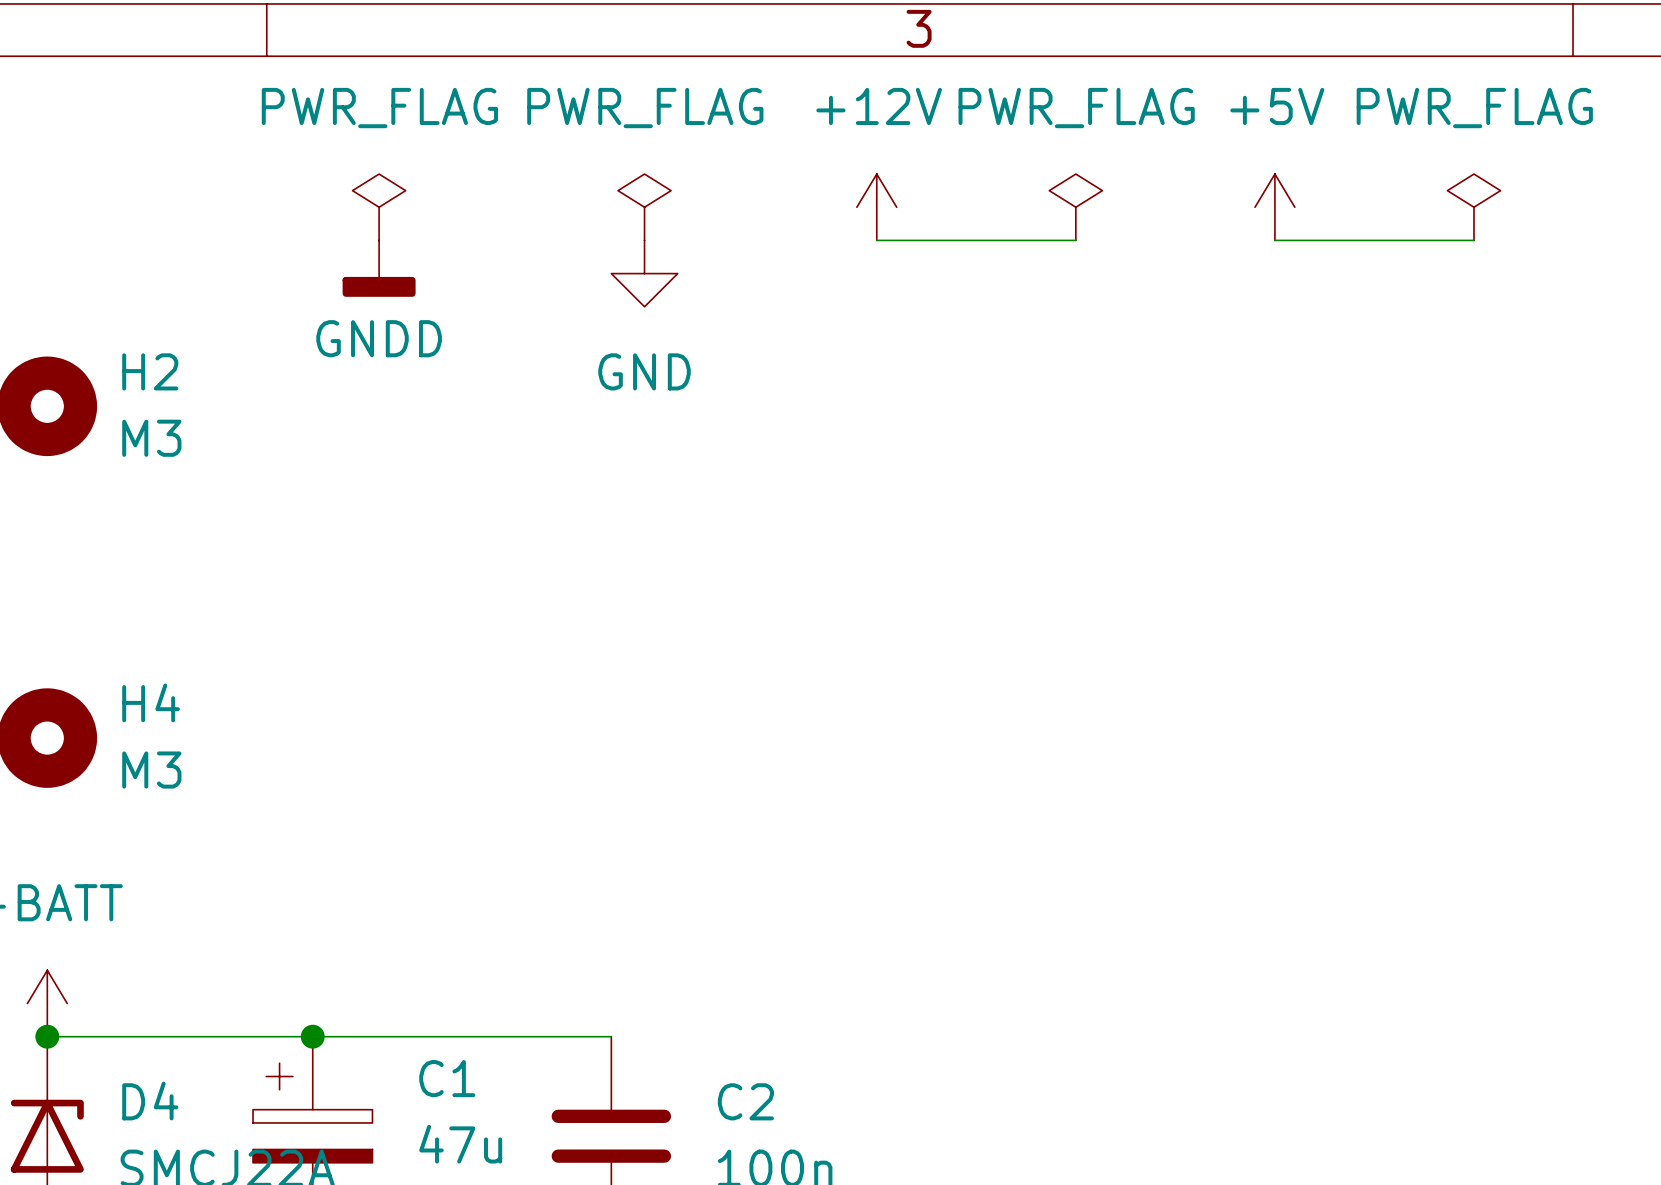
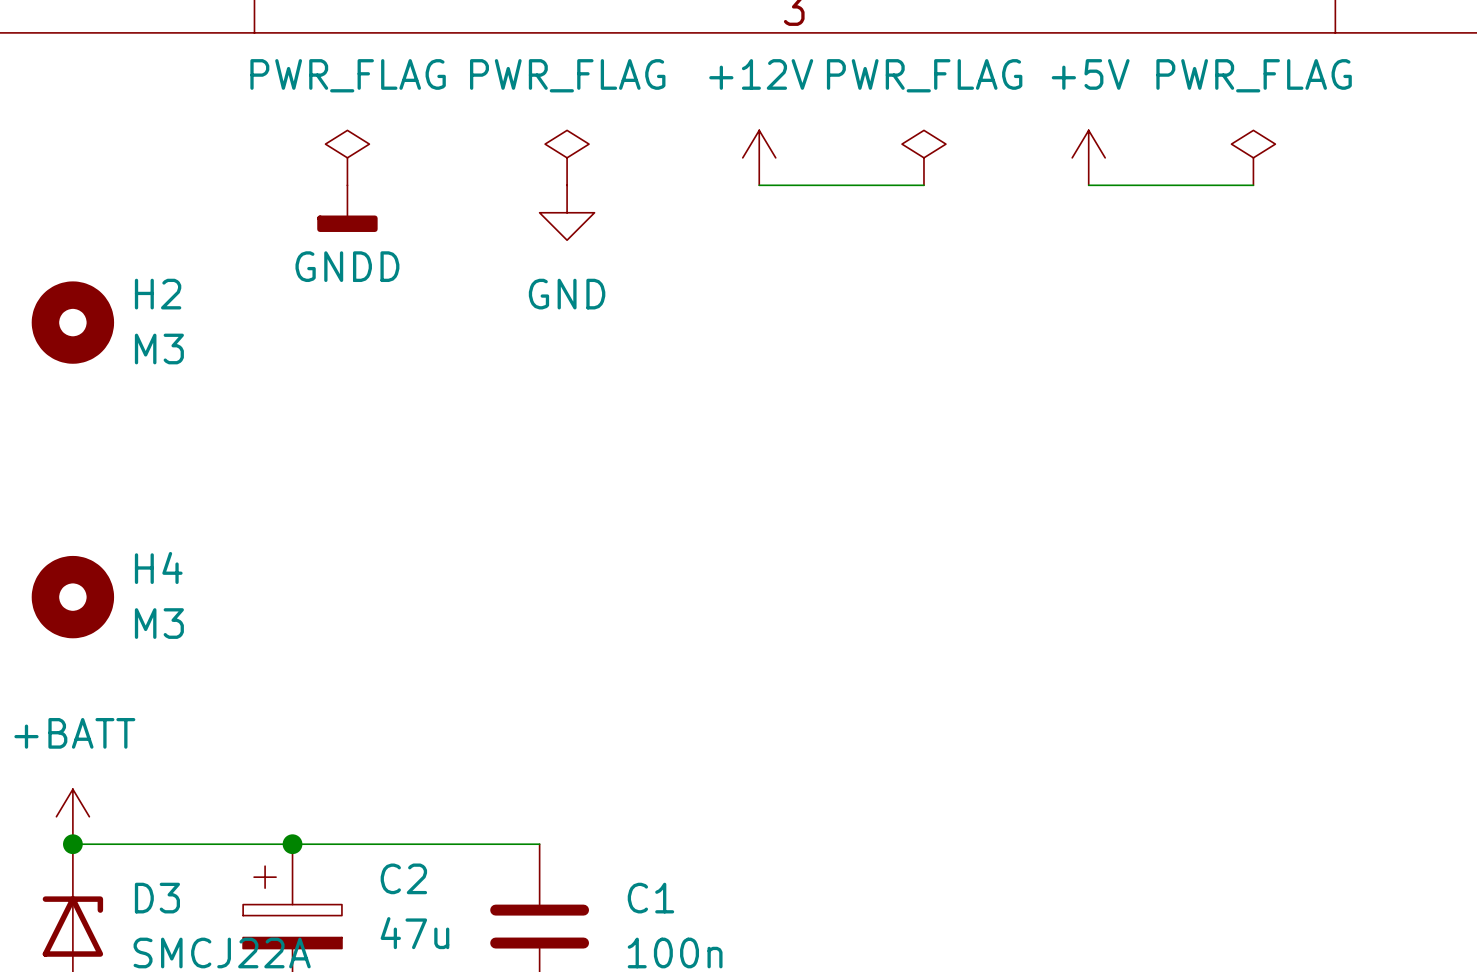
C1 name: C1 (447, 1078) -> C2 (403, 878)
D4 name: D4 (150, 1101) -> D3 (157, 898)
C2 name: C2 (745, 1101) -> C1 (650, 898)

